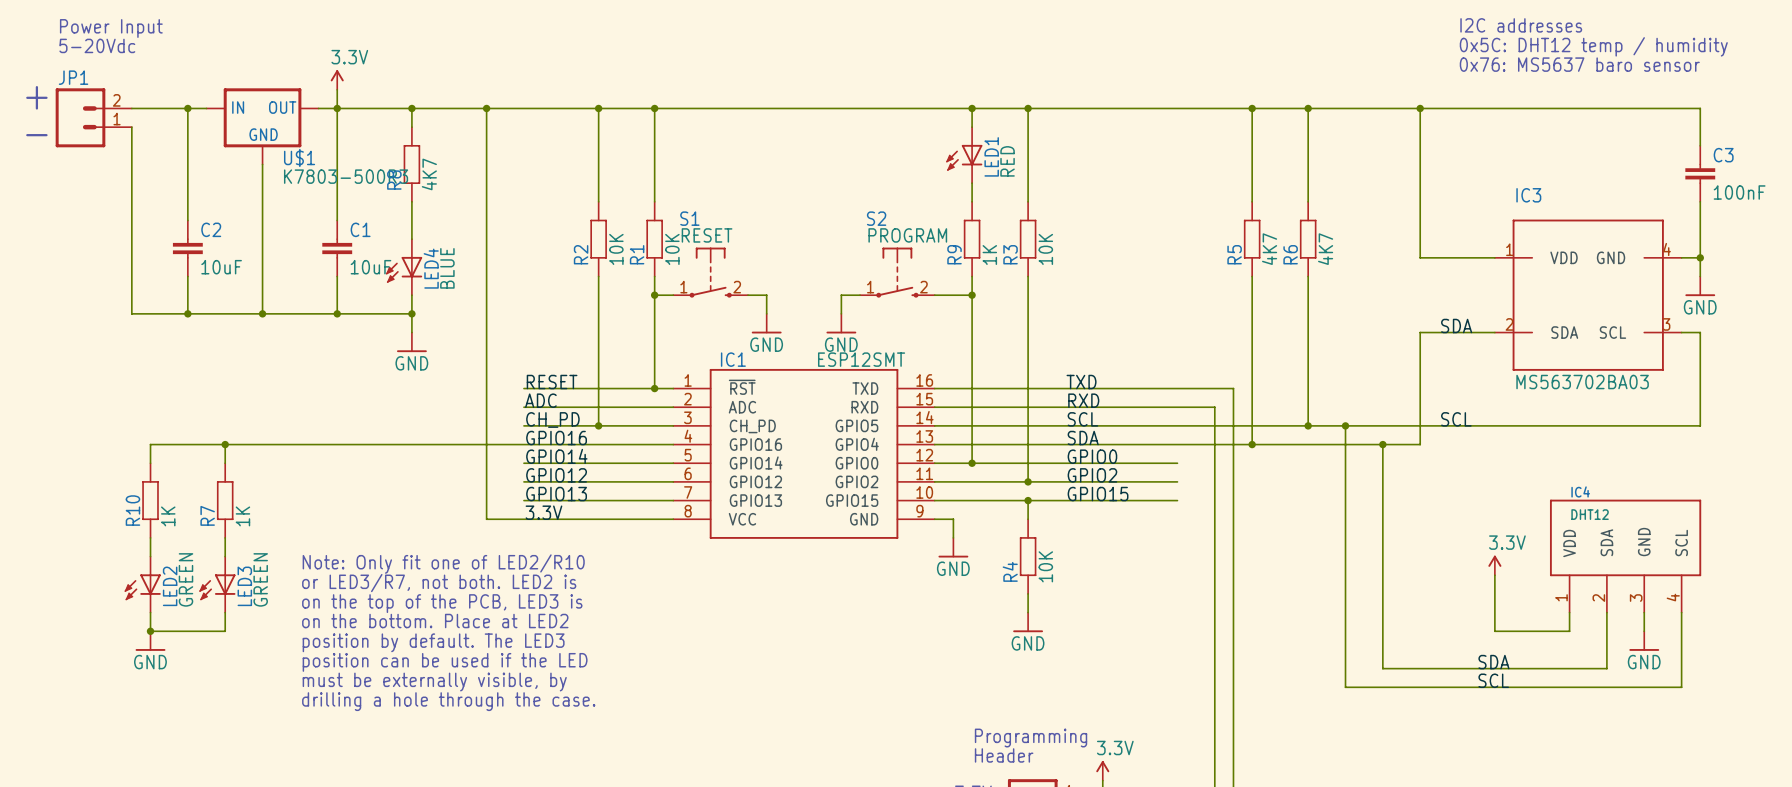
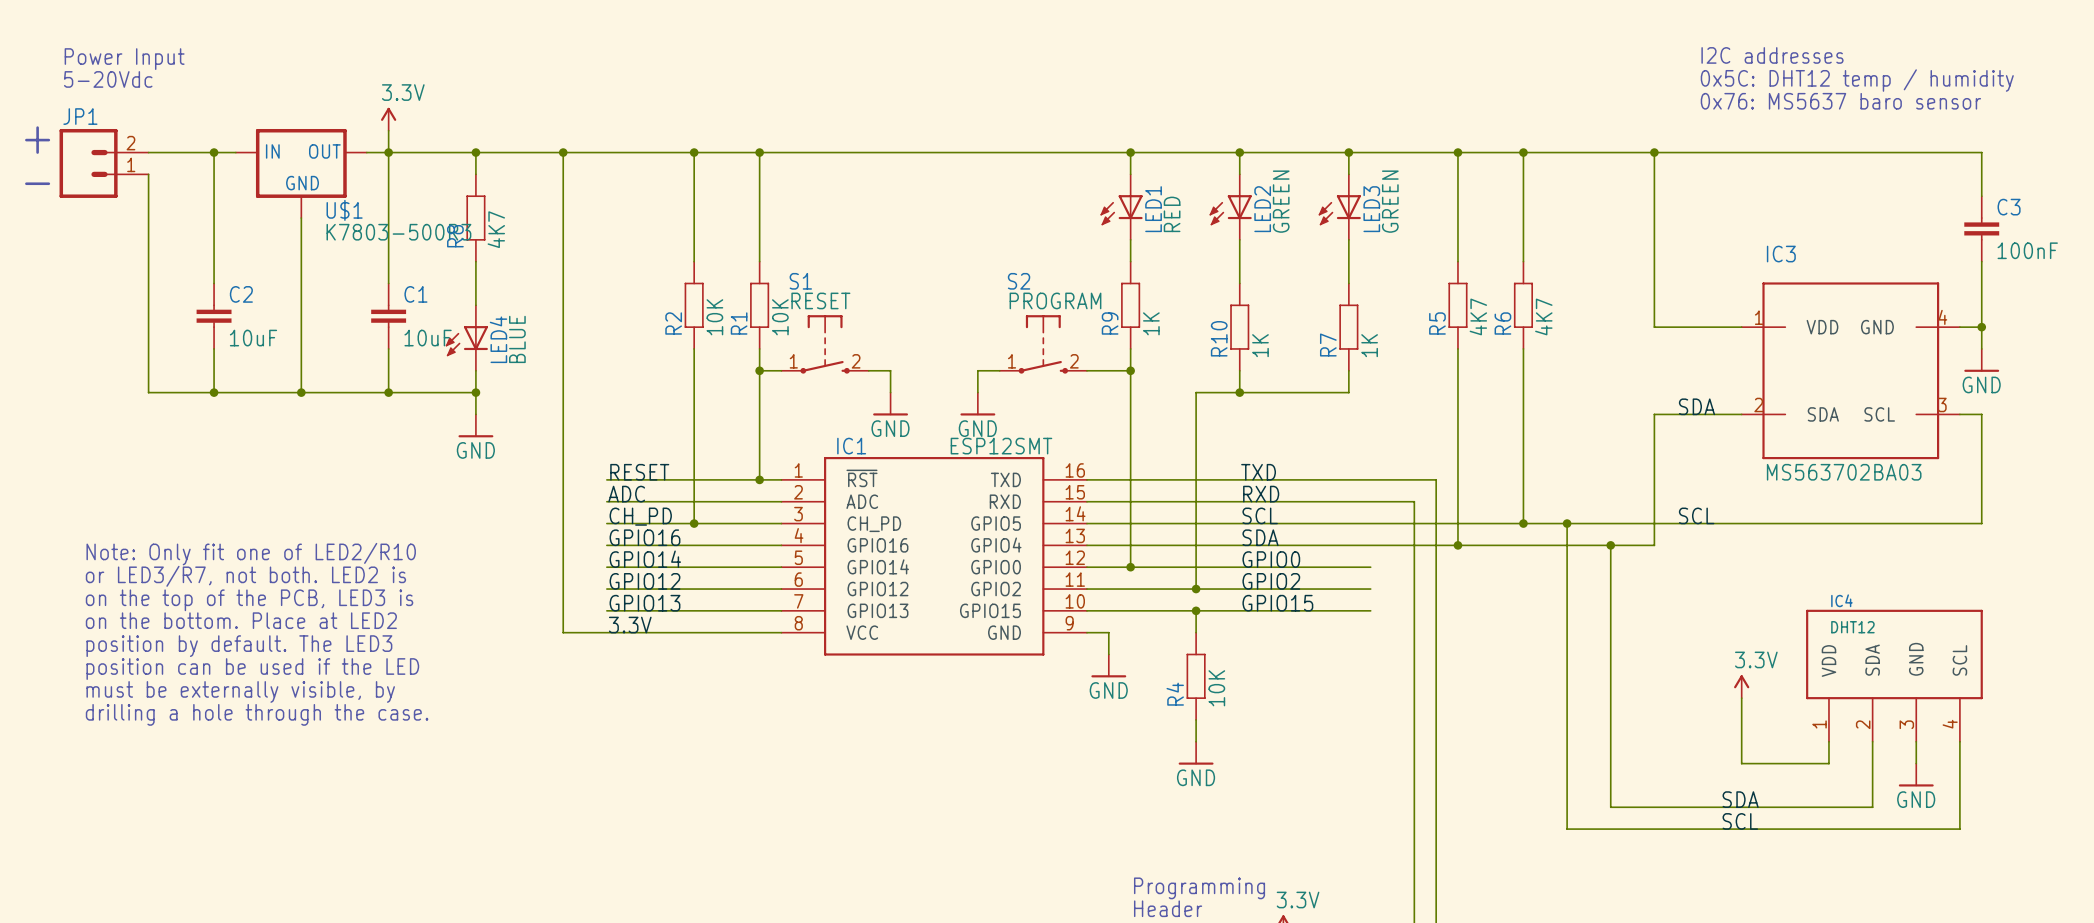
wire: (1028, 108) (1028, 201) -> none
junction position: (1028, 108) -> (1239, 152)
wire: none -> (1239, 152) (1239, 174)
wire: none -> (1348, 152) (1348, 174)
junction: none -> (1348, 152)
wire: none -> (1239, 239) (1239, 283)
wire: none -> (1348, 239) (1348, 283)
R3: 10K (1028, 239) -> none
wire: (1028, 276) (1028, 313) -> (1348, 370) (1348, 392) (1196, 392)
wire: none -> (1239, 370) (1239, 392)
junction: none -> (1239, 392)
wire: (225, 444) (225, 463) -> none
junction: (225, 444) -> none
wire: (523, 444) (150, 444) (150, 463) -> none
text: none -> Note: Only fit one of LED2/R10 (251, 554)
text: none -> or LED3/R7, not both. LED2 is (245, 576)
text: none -> on the top of the PCB, LED3 is (249, 600)
R10 position: (150, 500) -> (1239, 327)
R7 position: (225, 500) -> (1348, 327)
text: none -> on the bottom. Place at LED2 (241, 620)
text: none -> position by default. The LED3 (239, 646)
wire: (150, 537) (150, 556) -> none
wire: (225, 537) (225, 556) -> none
text: none -> position can be used if the LED (252, 669)
text: Note: Only fit one of LED2/R10 (443, 564) -> none
text: none -> must be externally visible, by (240, 691)
text: or LED3/R7, not both. LED2 is (439, 583) -> none
LED2 position: (142, 584) -> (1230, 207)
LED3 position: (217, 584) -> (1339, 207)
text: none -> drilling a hole through the case. (257, 714)
text: on the top of the PCB, LED3 is (442, 603) -> none
wire: (150, 612) (150, 631) (225, 631) (225, 612) -> none
text: on the bottom. Place at LED2 (435, 621) -> none
junction: (150, 631) -> none
power symbol: GND (150, 641) -> none
text: position by default. The LED3 (433, 642) -> none
text: position can be used if the LED (445, 662) -> none
text: must be externally visible, by (434, 682) -> none
text: drilling a hole through the case. (448, 701) -> none

